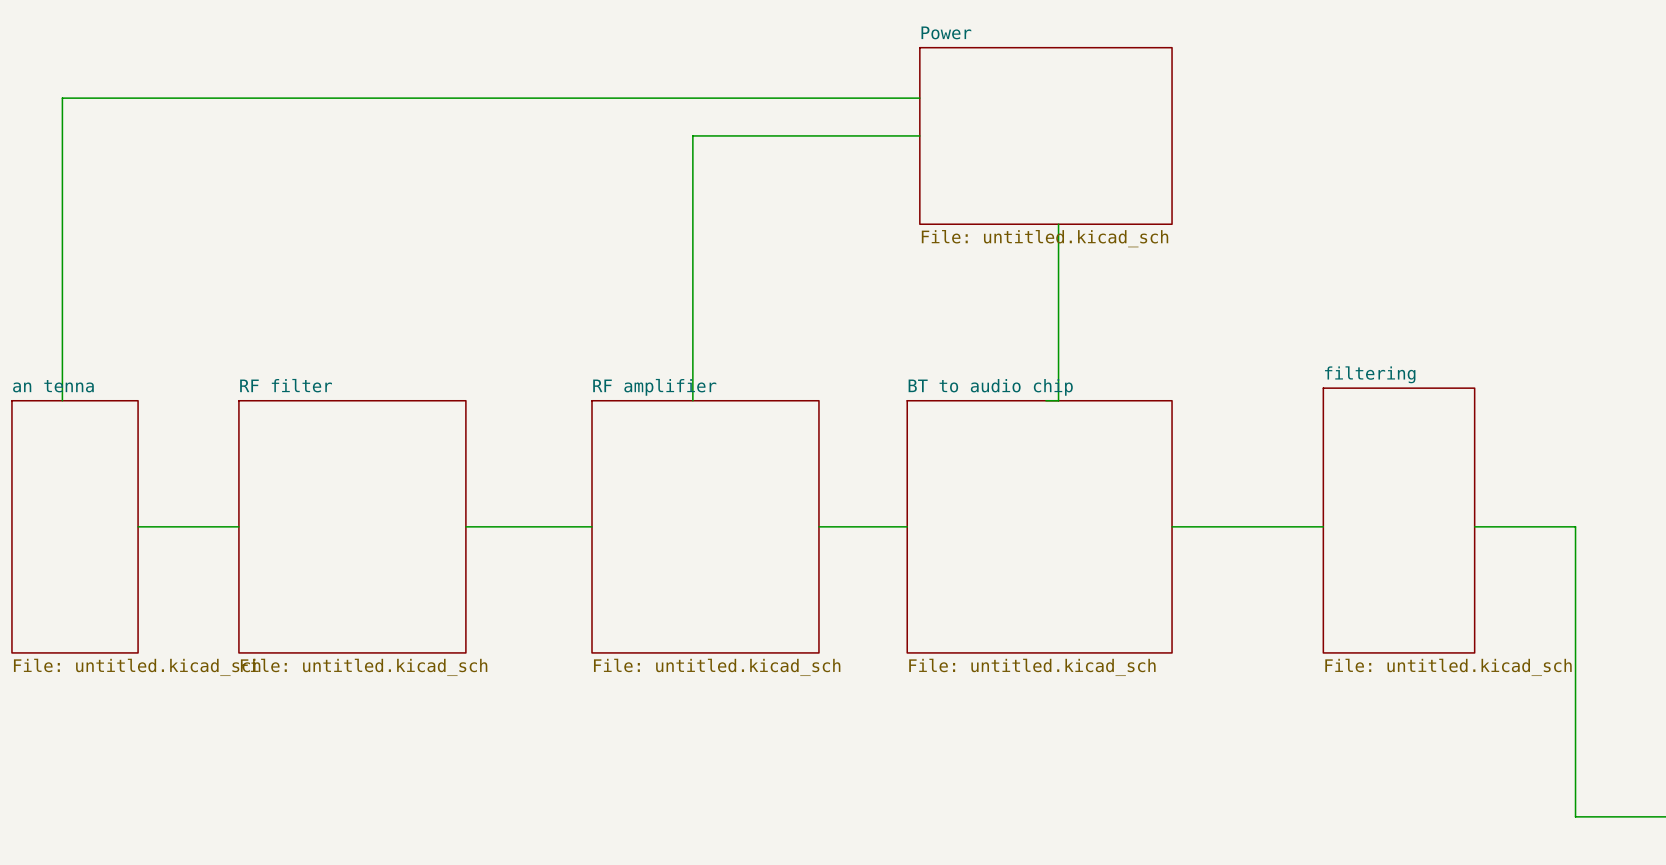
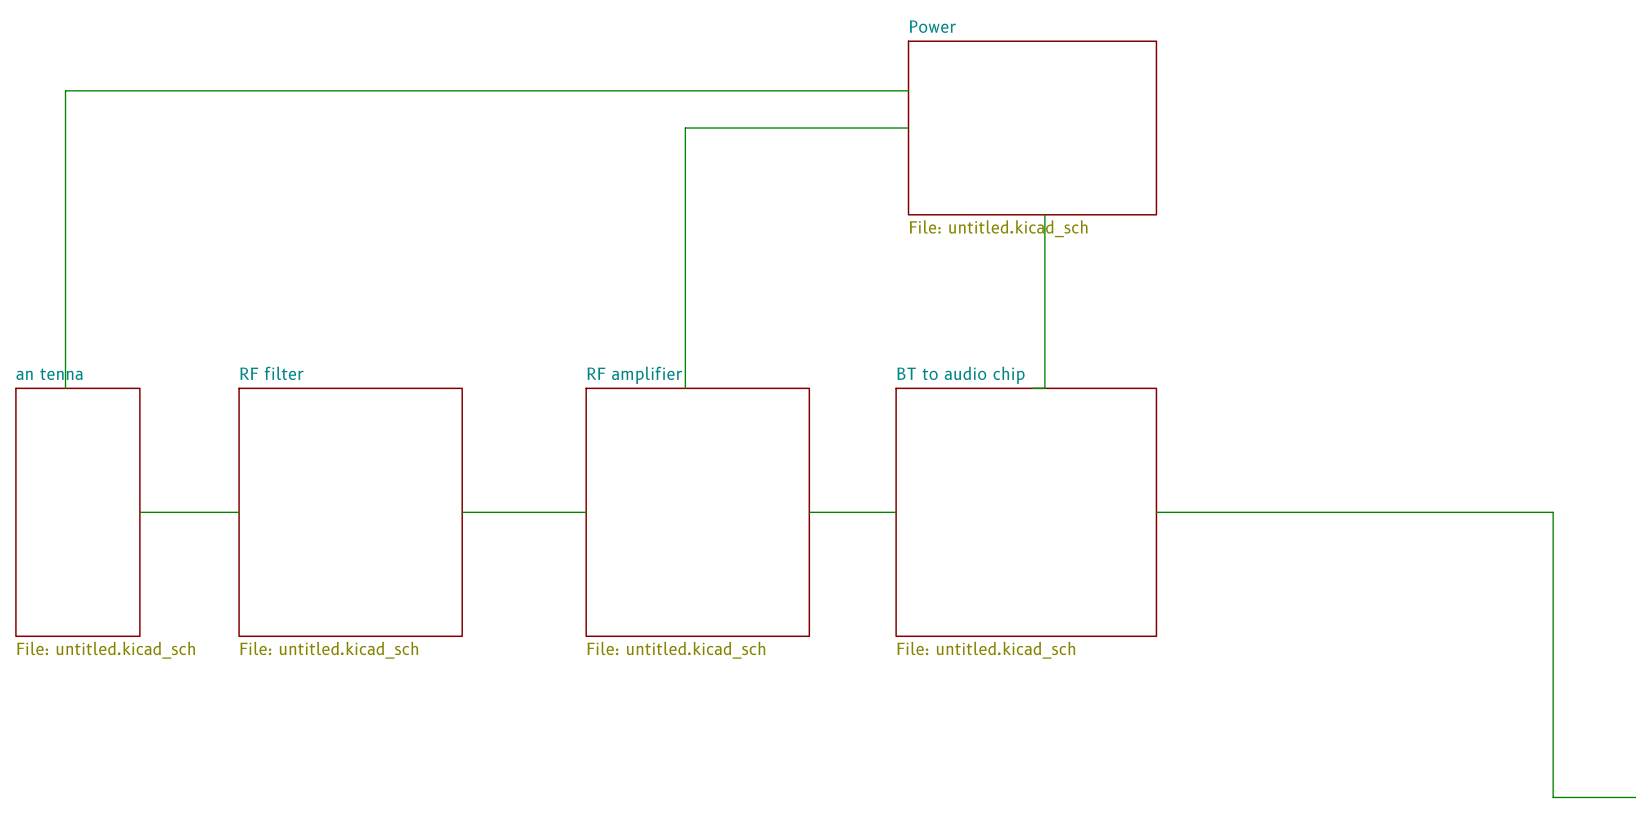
sheet filtering: File: untitled.kicad_sch (1398, 520) -> none
wire: none -> (1305, 512) (1453, 512)

